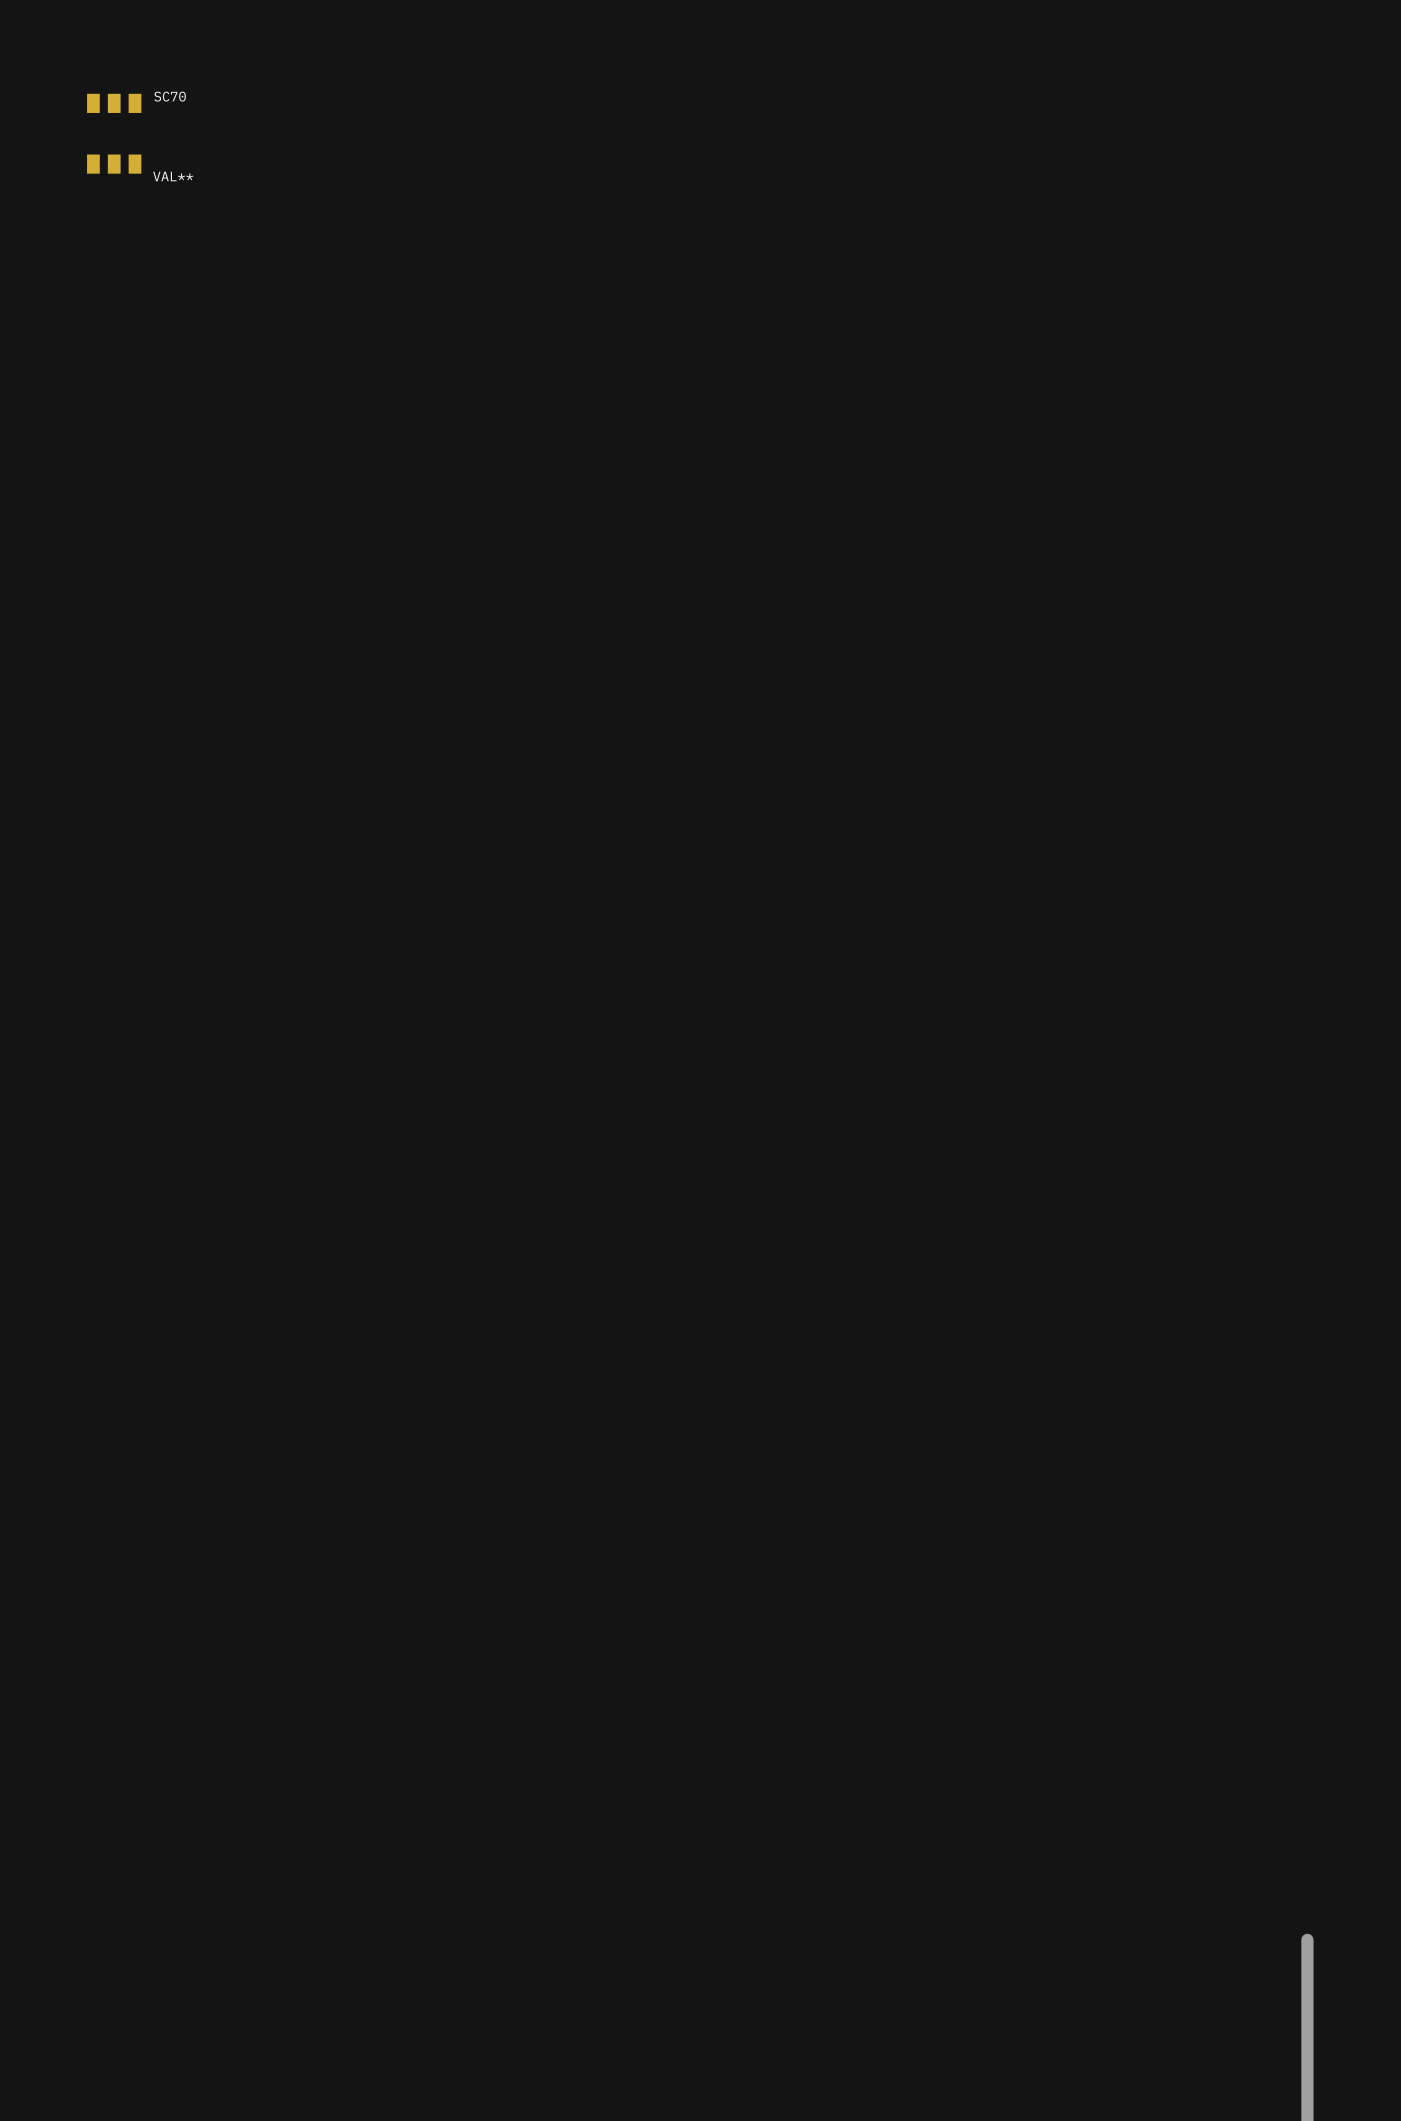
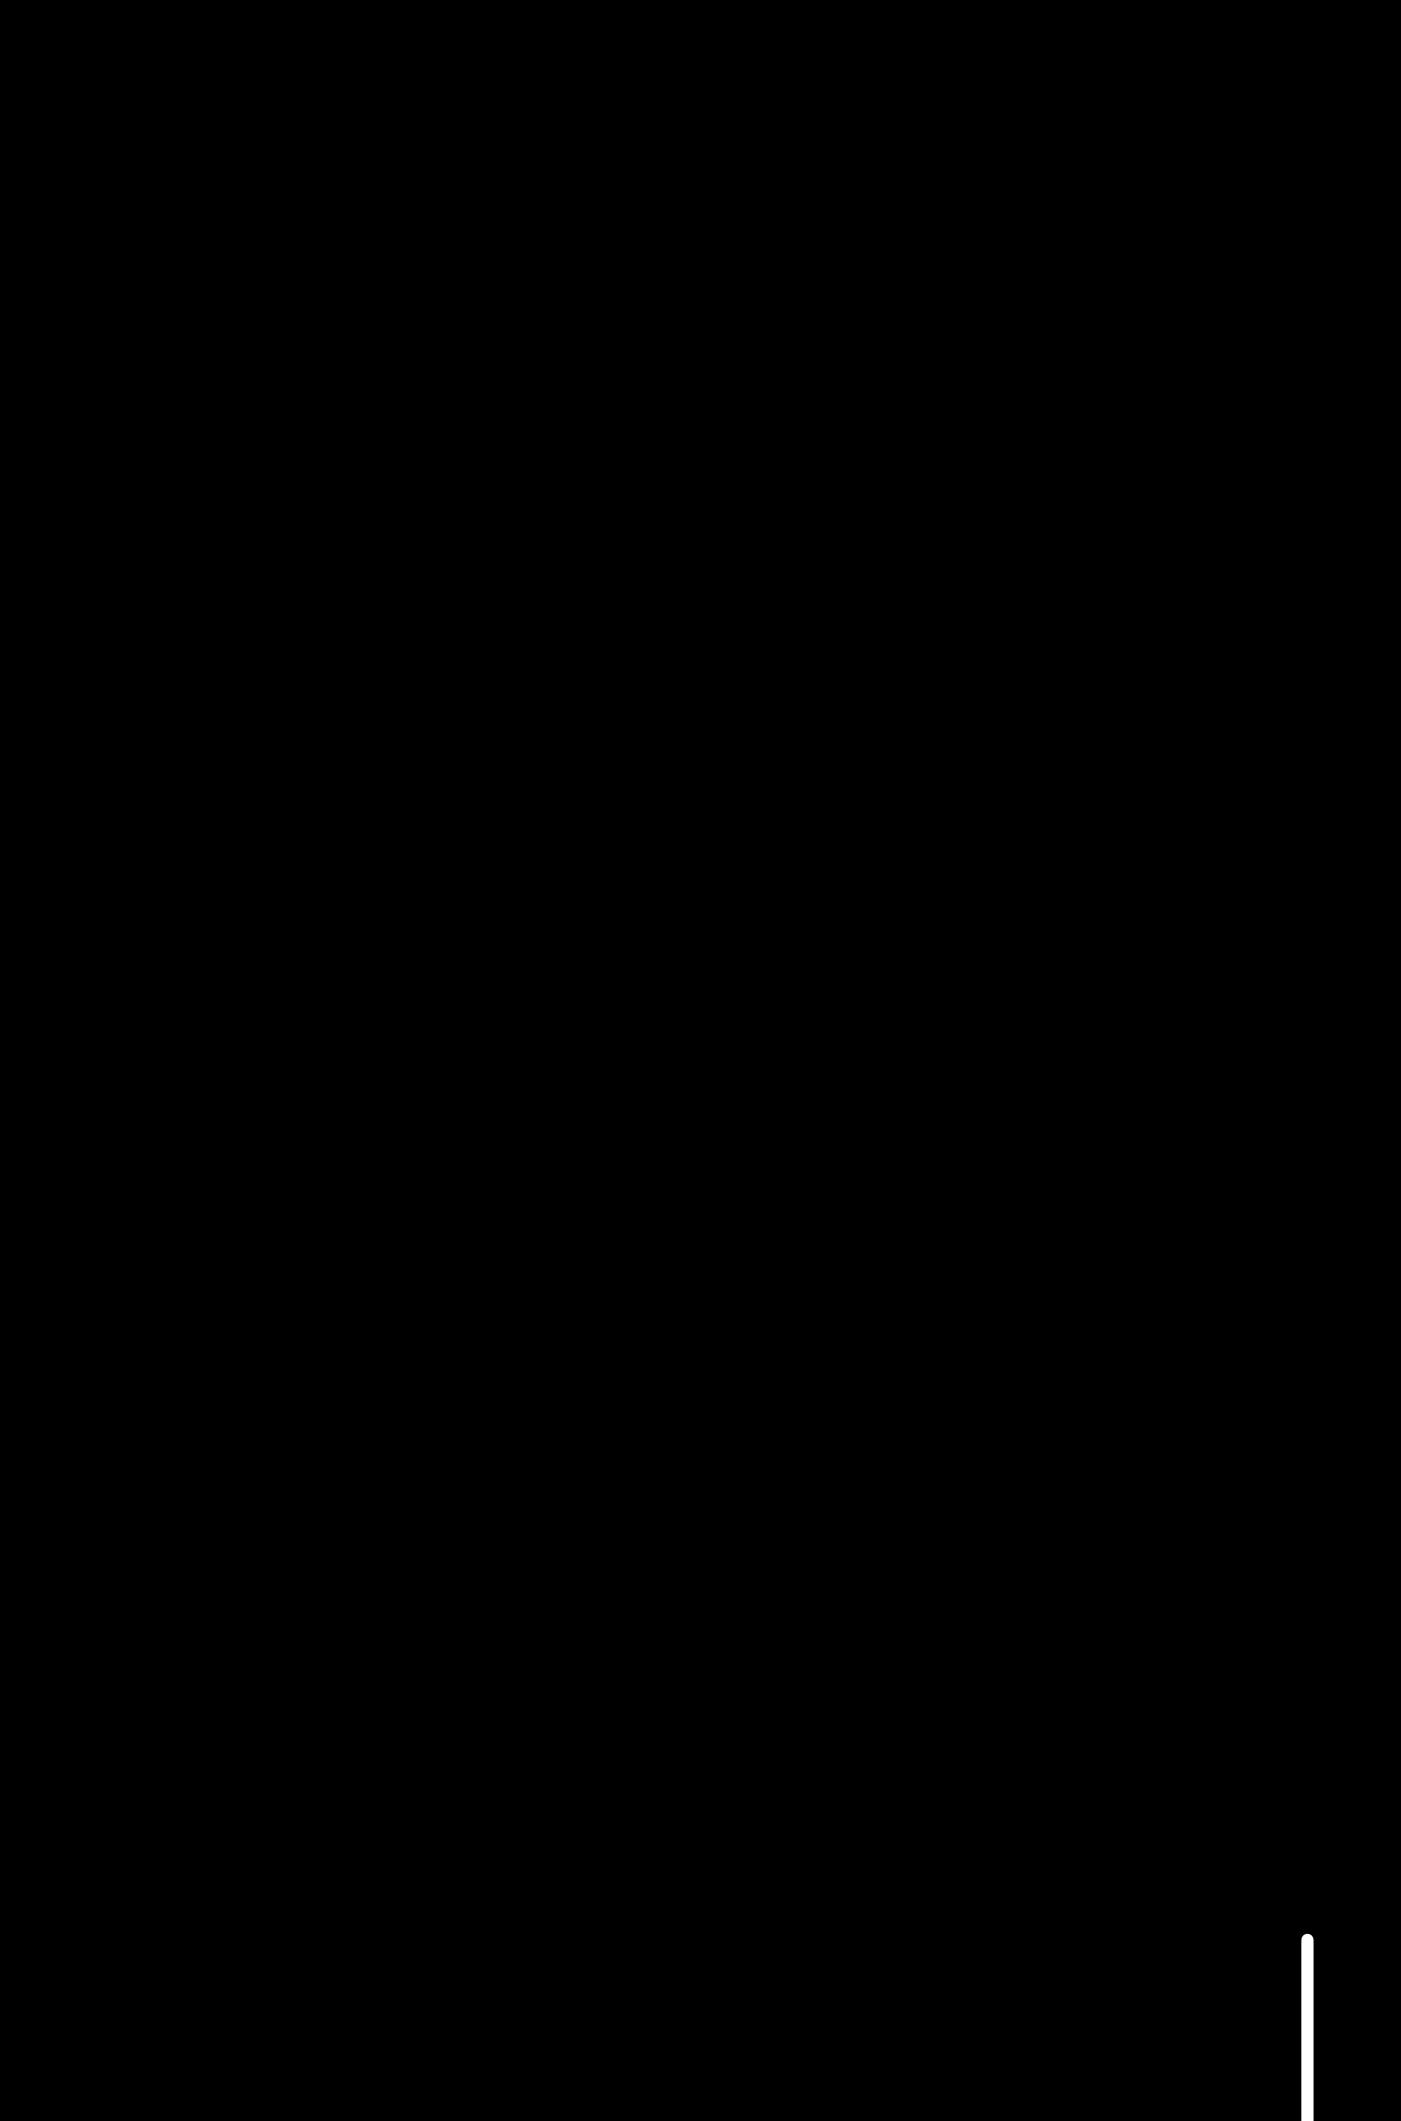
SC70: VAL** (114, 133) -> none

